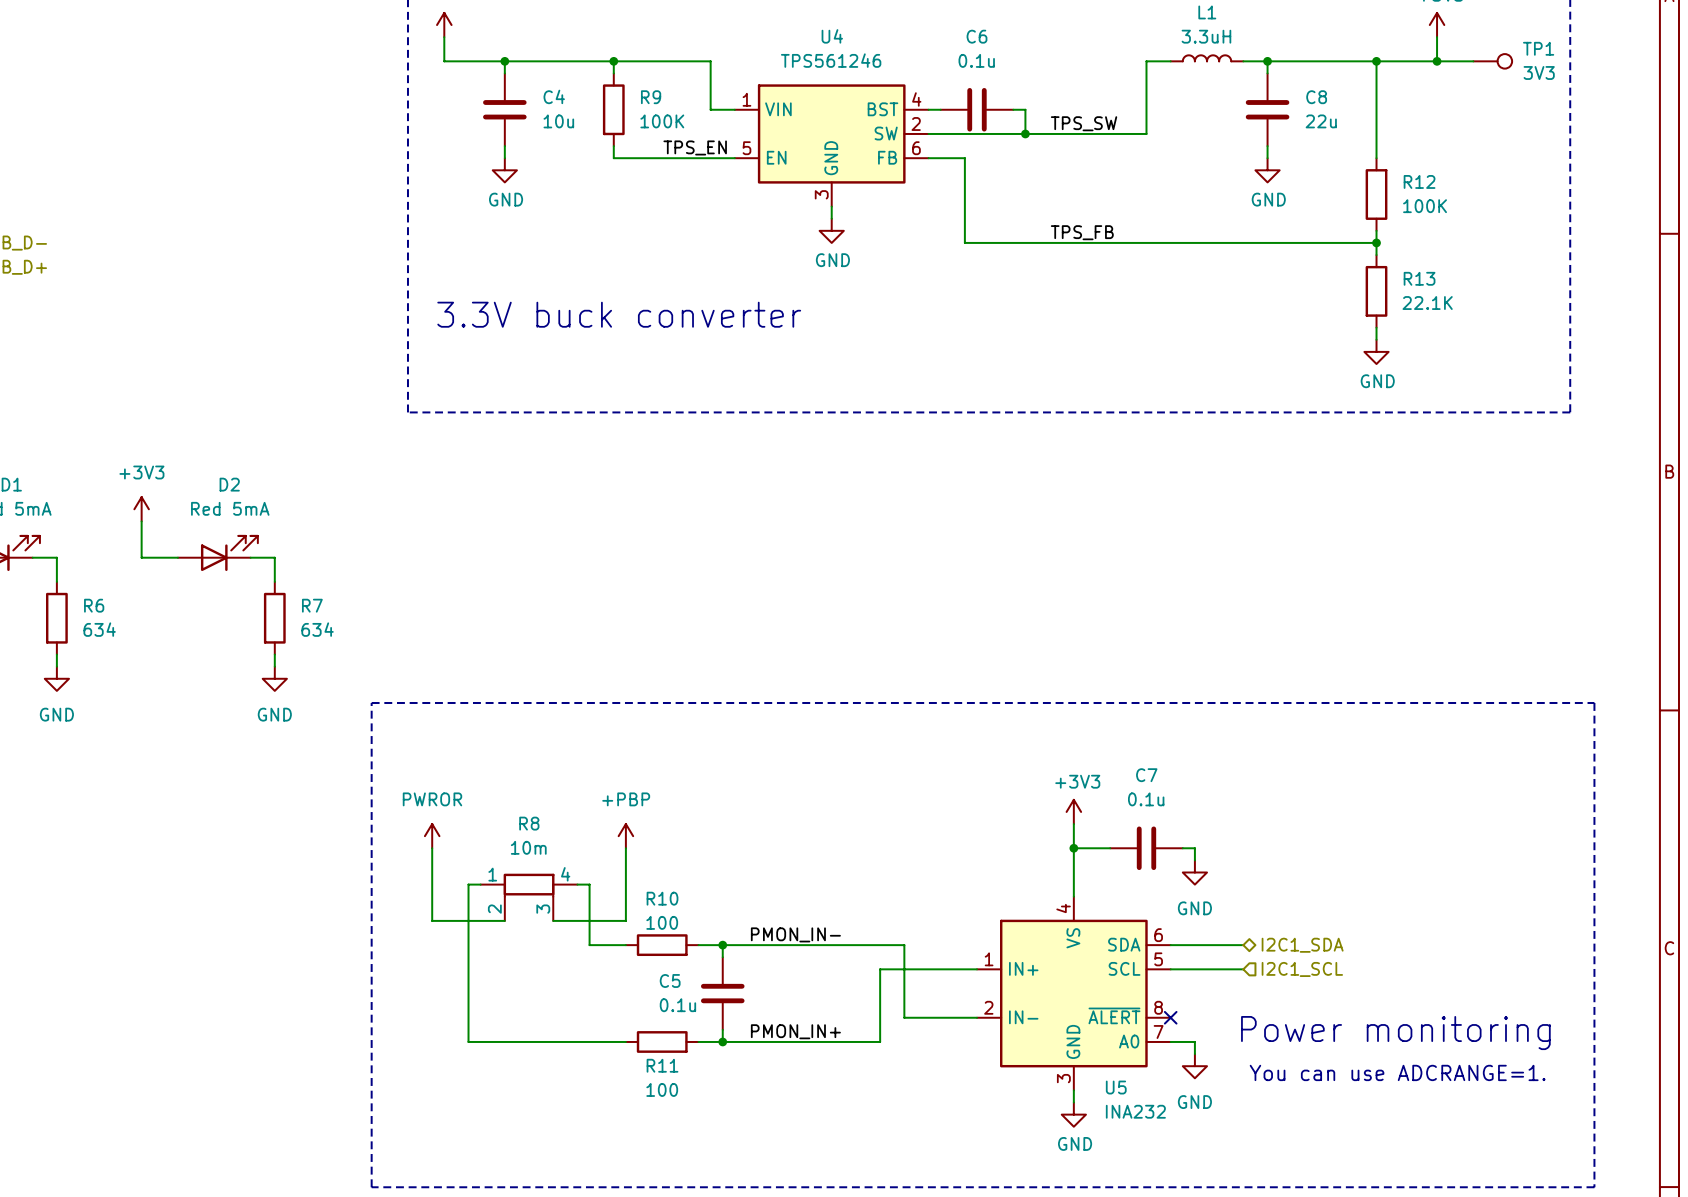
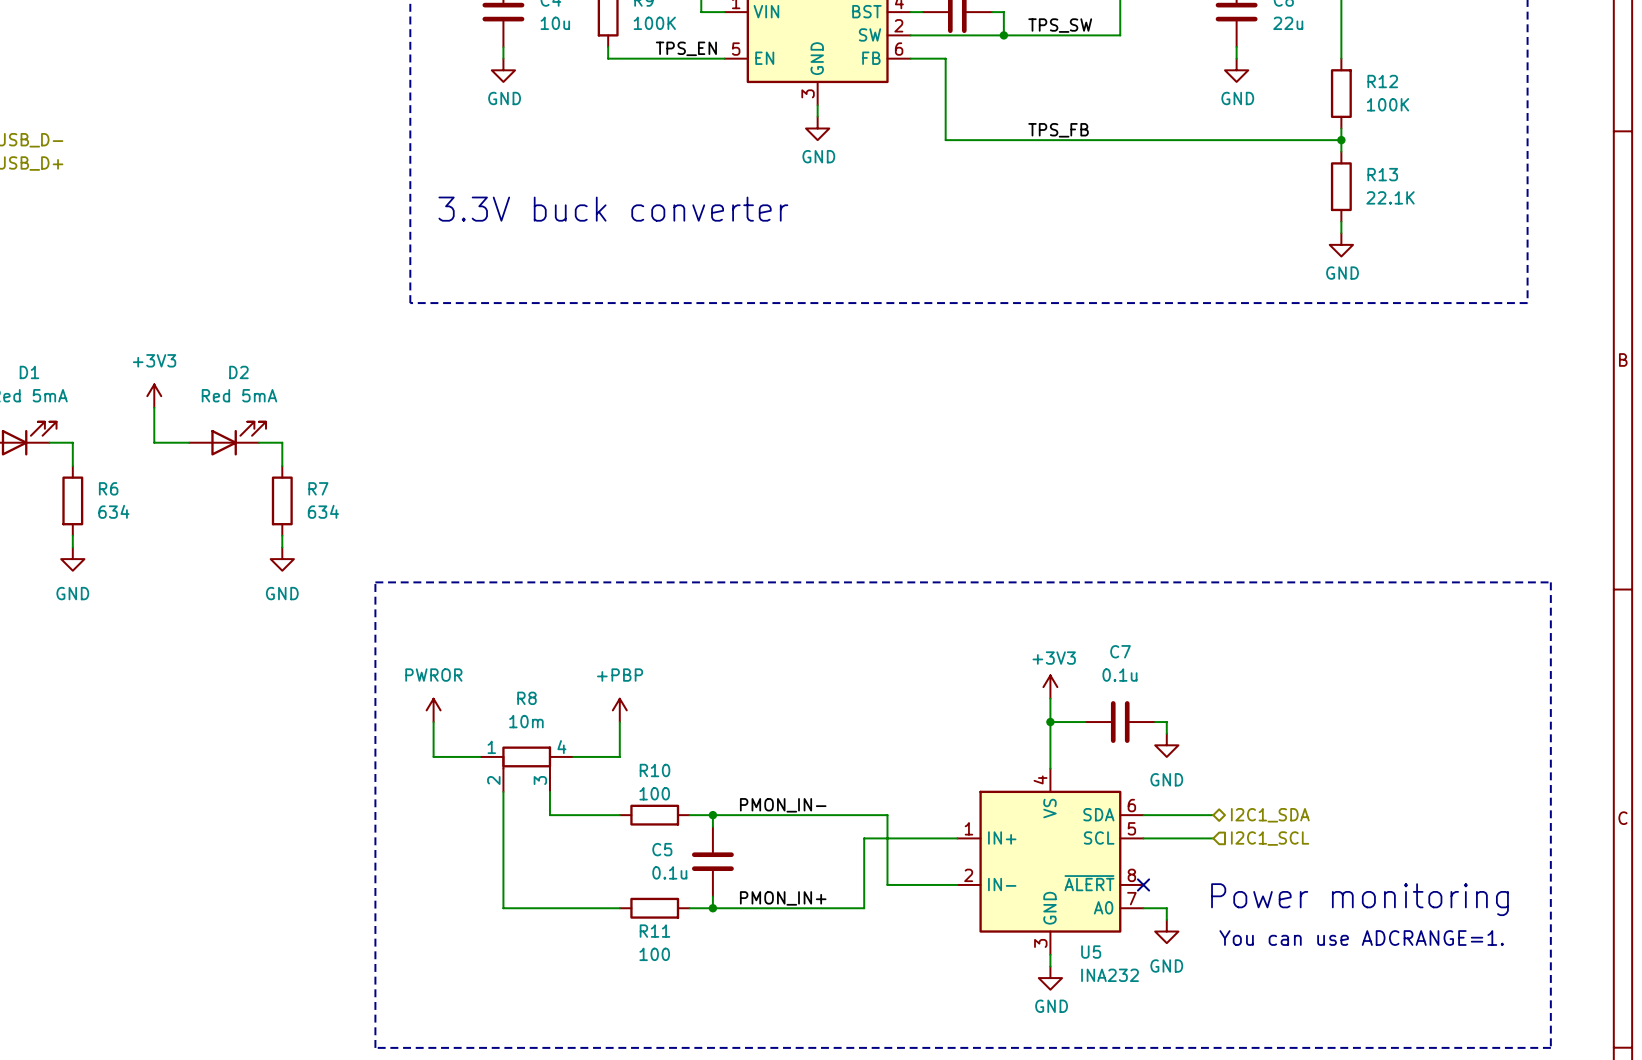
wire: (432, 884) (432, 920) (504, 920) -> (433, 756) (468, 756)
wire: (468, 884) (468, 1041) (504, 1041) -> (503, 791) (503, 908)
wire: (589, 884) (589, 945) -> (549, 791) (549, 815) (584, 815)
wire: (625, 884) (625, 920) (553, 920) -> (619, 756) (584, 756)

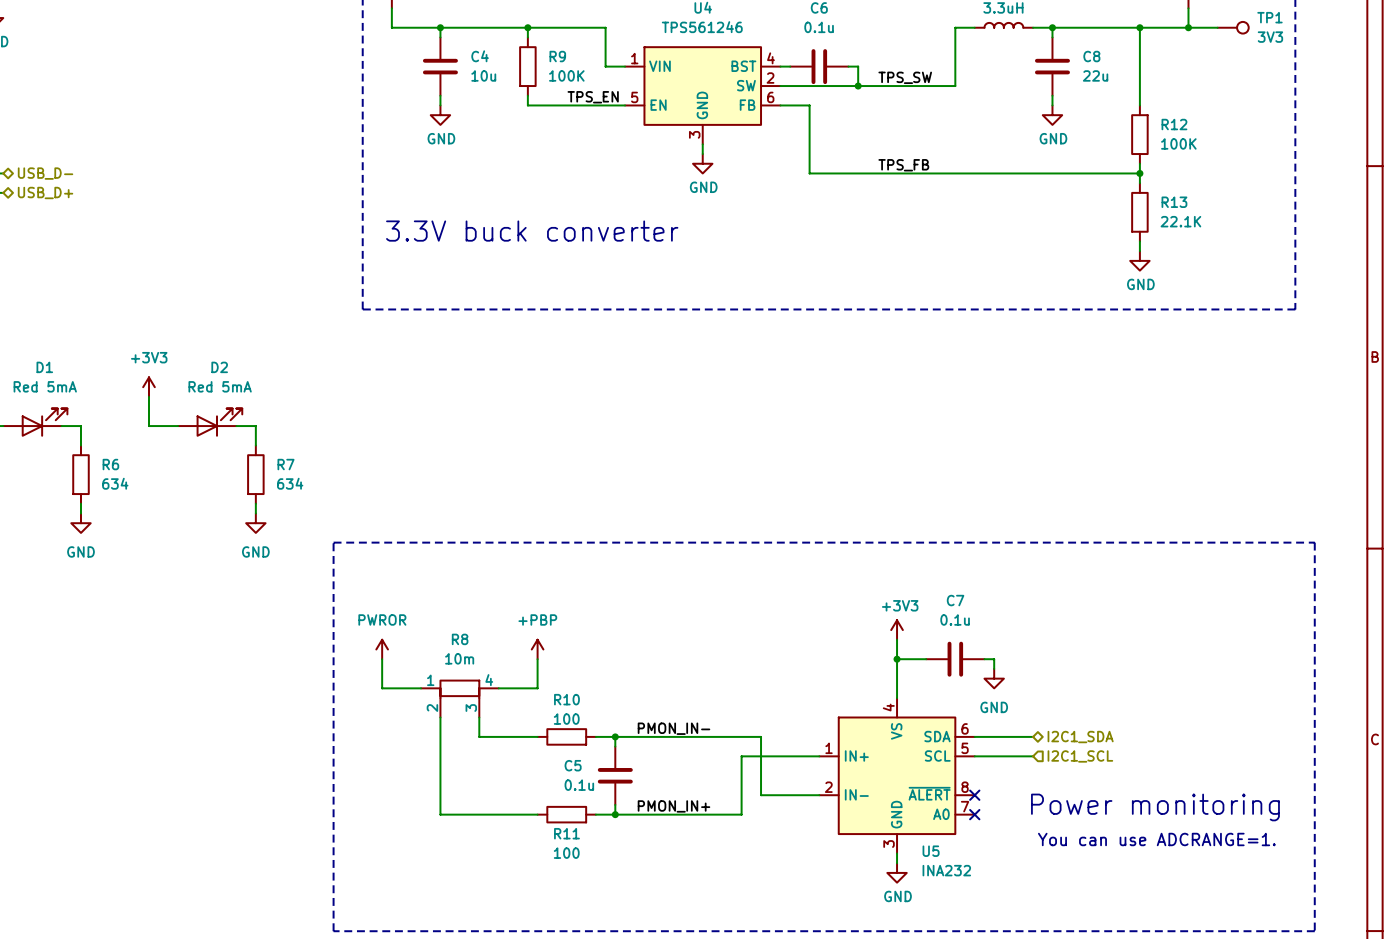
wire: (1143, 908) (1166, 908) (1166, 919) -> none
no-connect mark: none -> (974, 814)
power symbol: GND (1166, 931) -> none

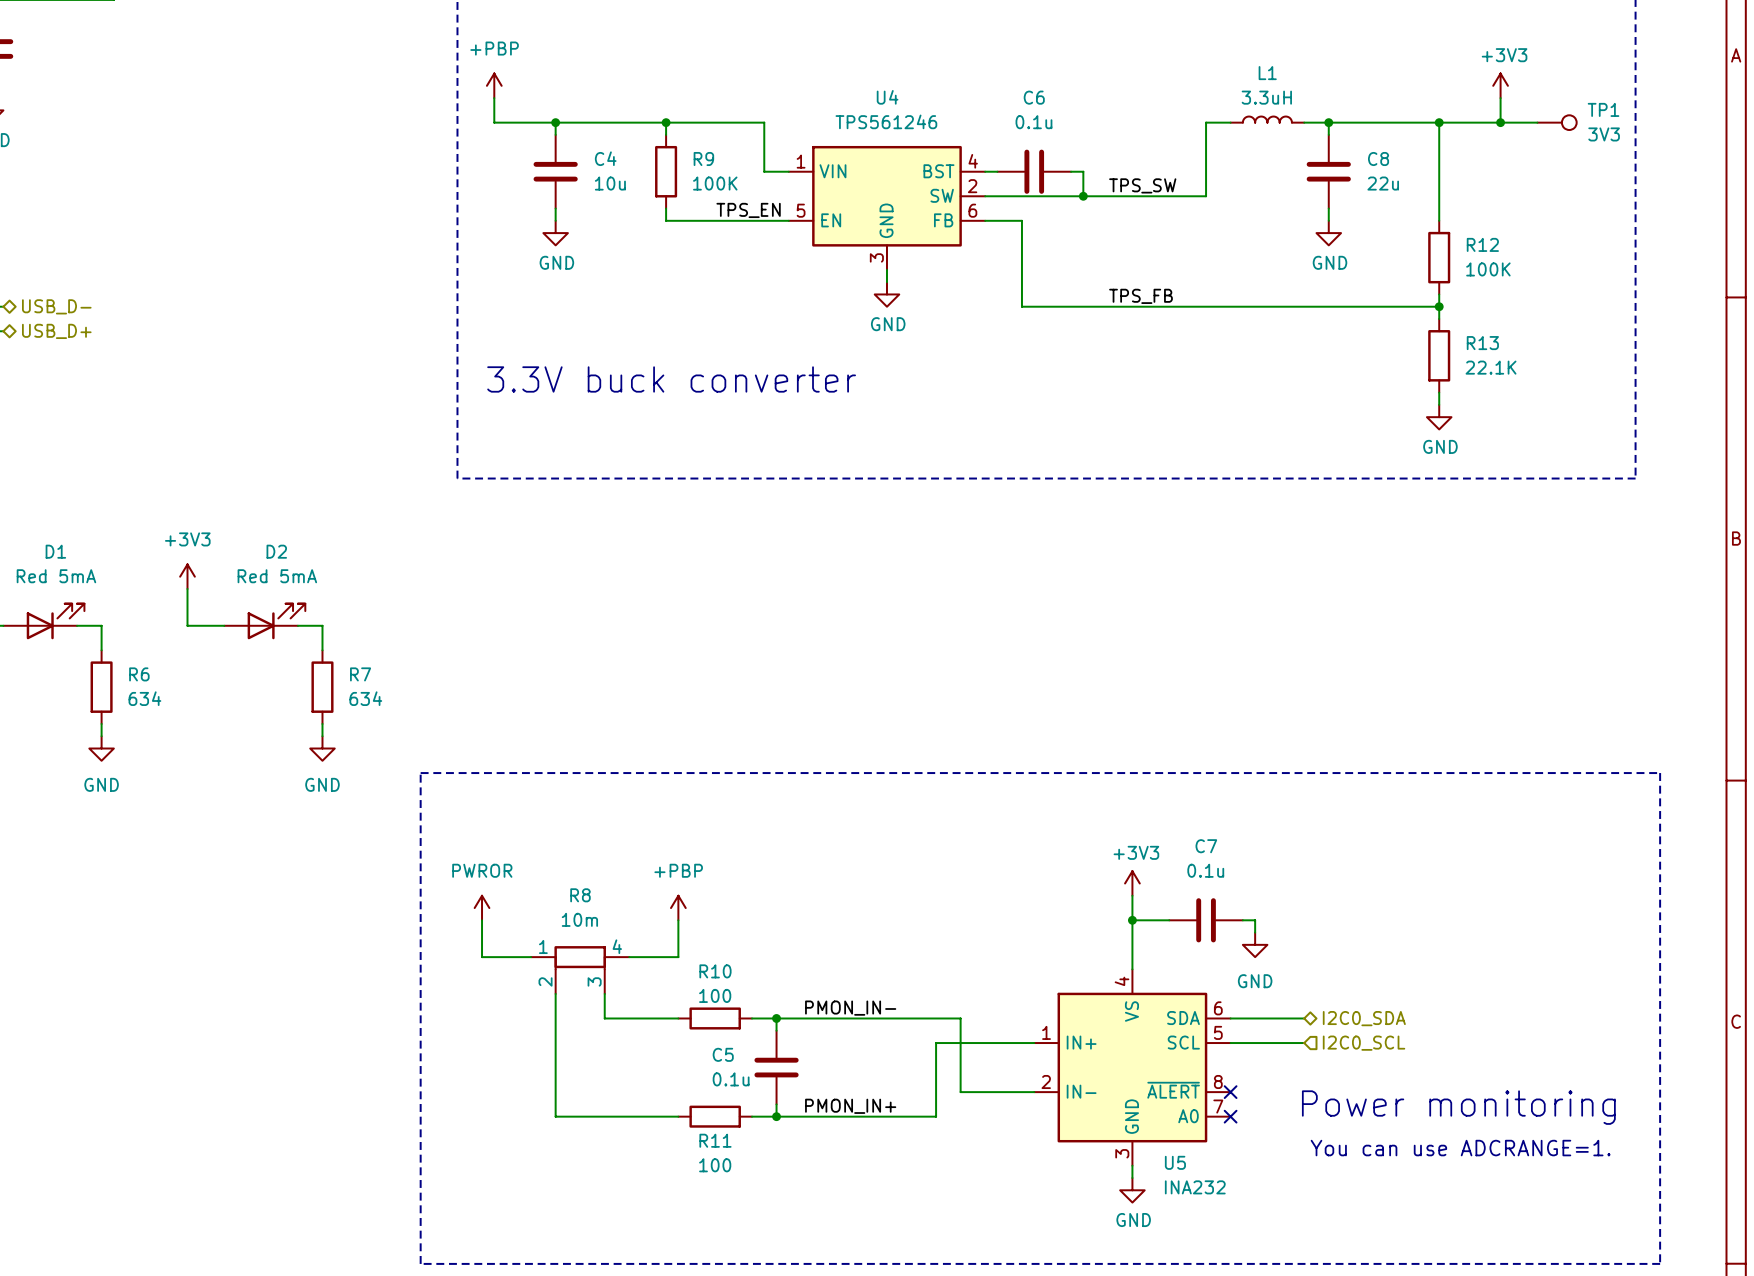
hierarchical label: I2C1_SDA (1080, 737) -> I2C0_SDA (1364, 1018)
hierarchical label: I2C1_SCL (1080, 756) -> I2C0_SCL (1364, 1043)

